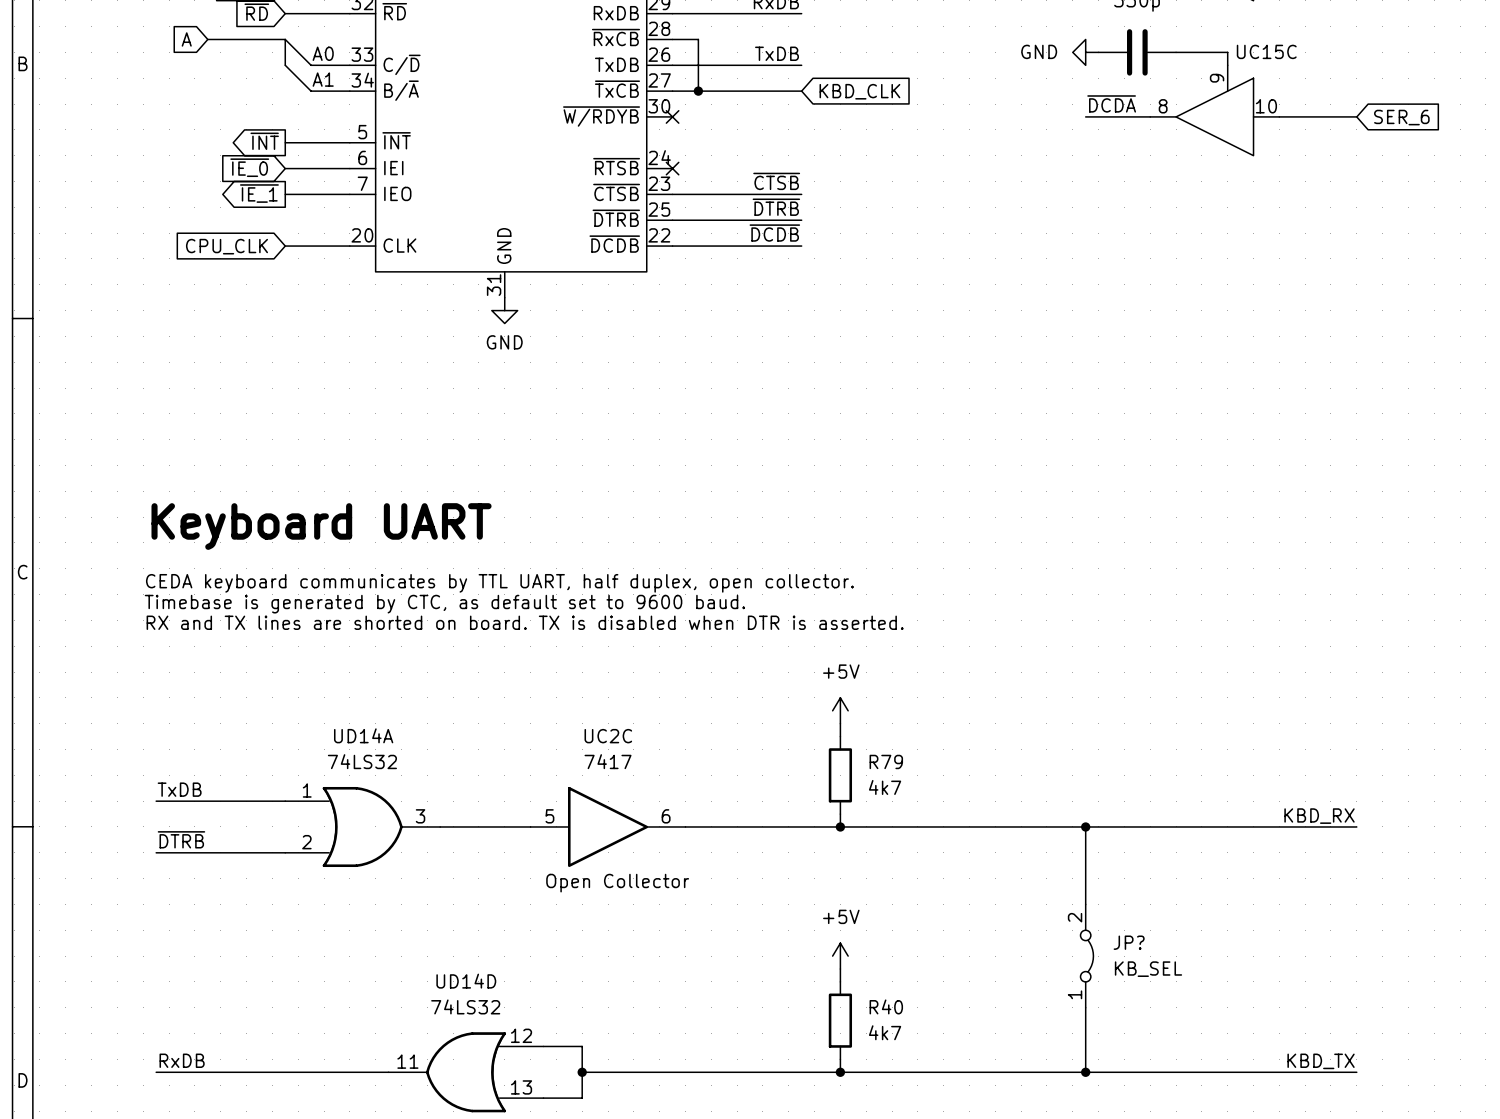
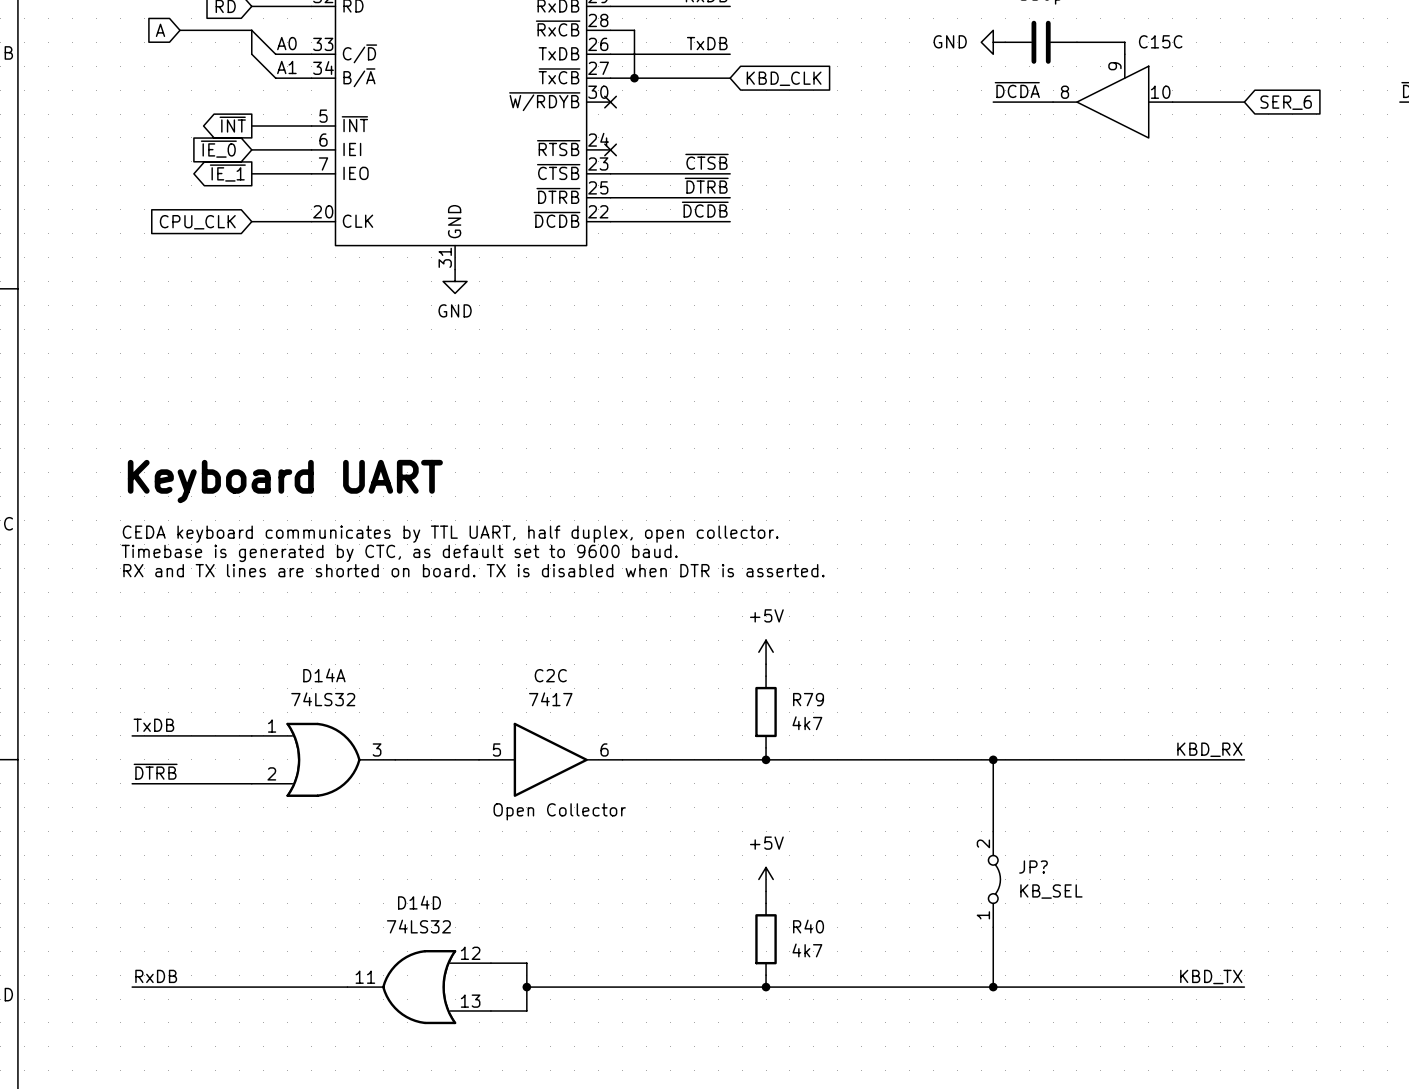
UC15C name: UC15C (1266, 51) -> C15C (1160, 41)
UD14A name: UD14A (363, 735) -> D14A (324, 675)
UC2C name: UC2C (608, 736) -> C2C (550, 675)
UD14D name: UD14D (466, 981) -> D14D (419, 902)

